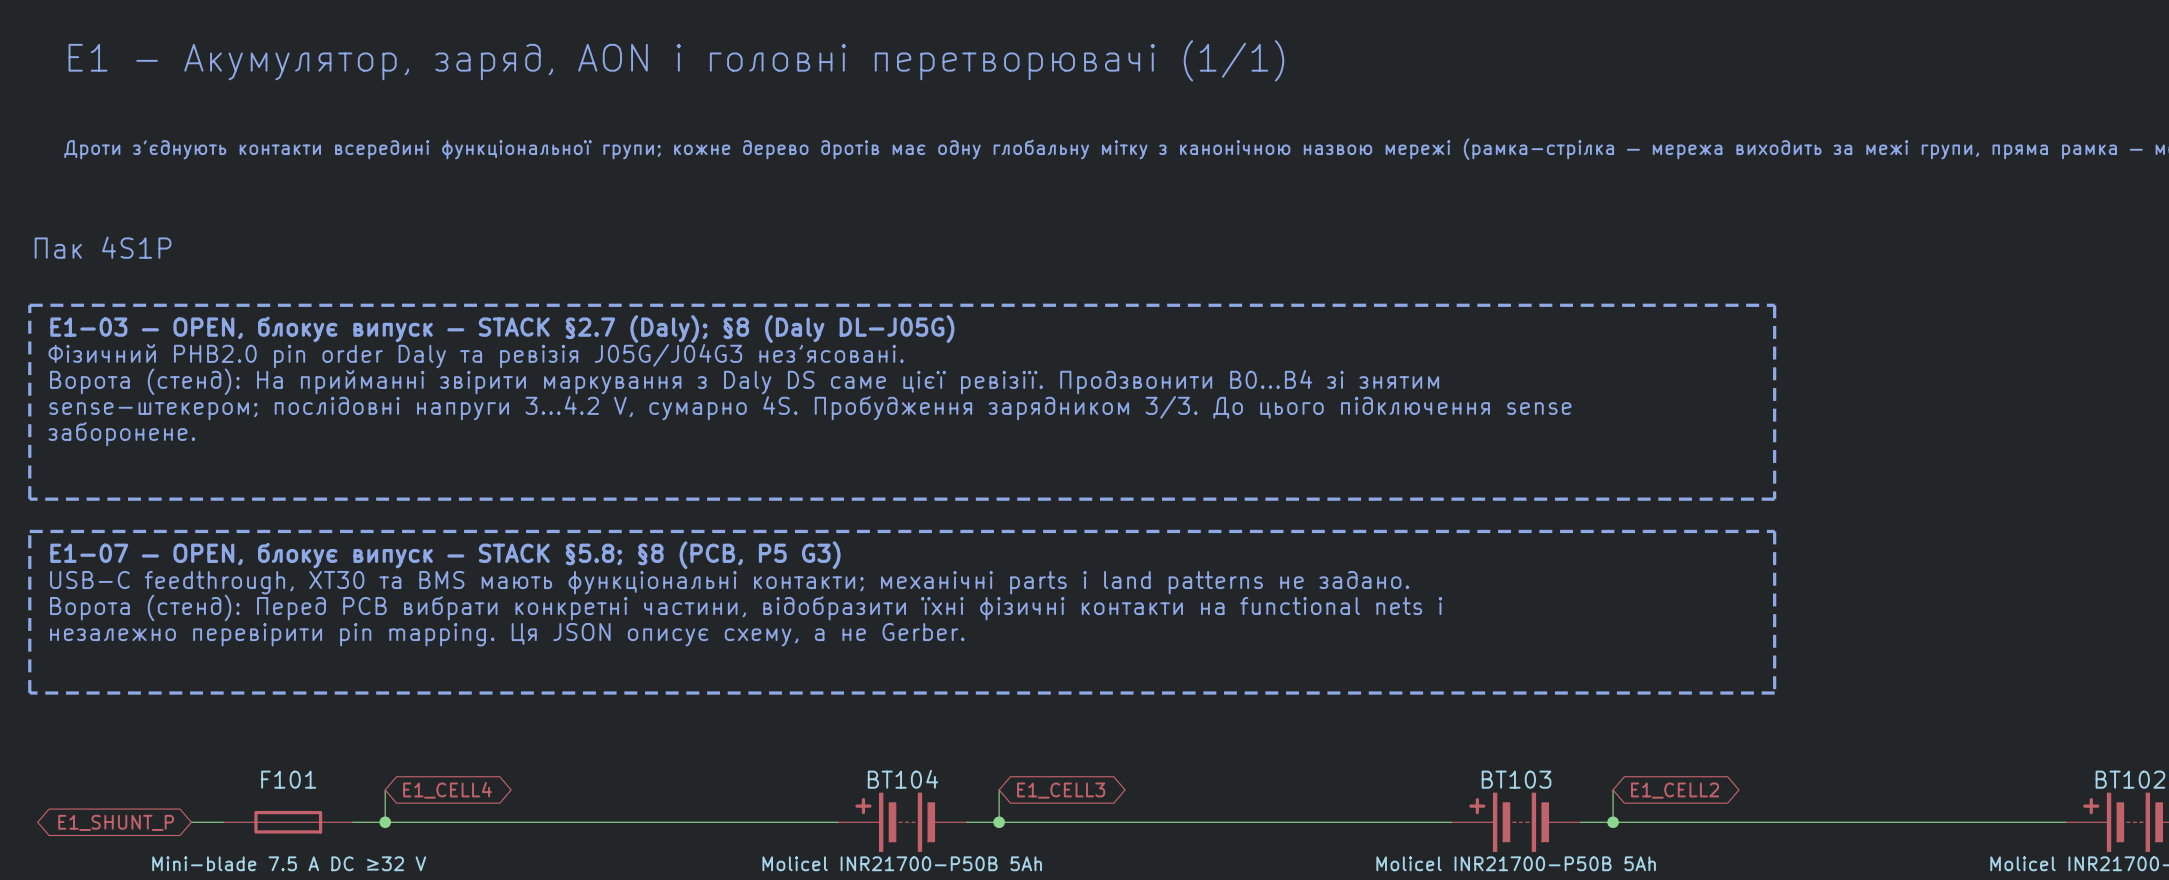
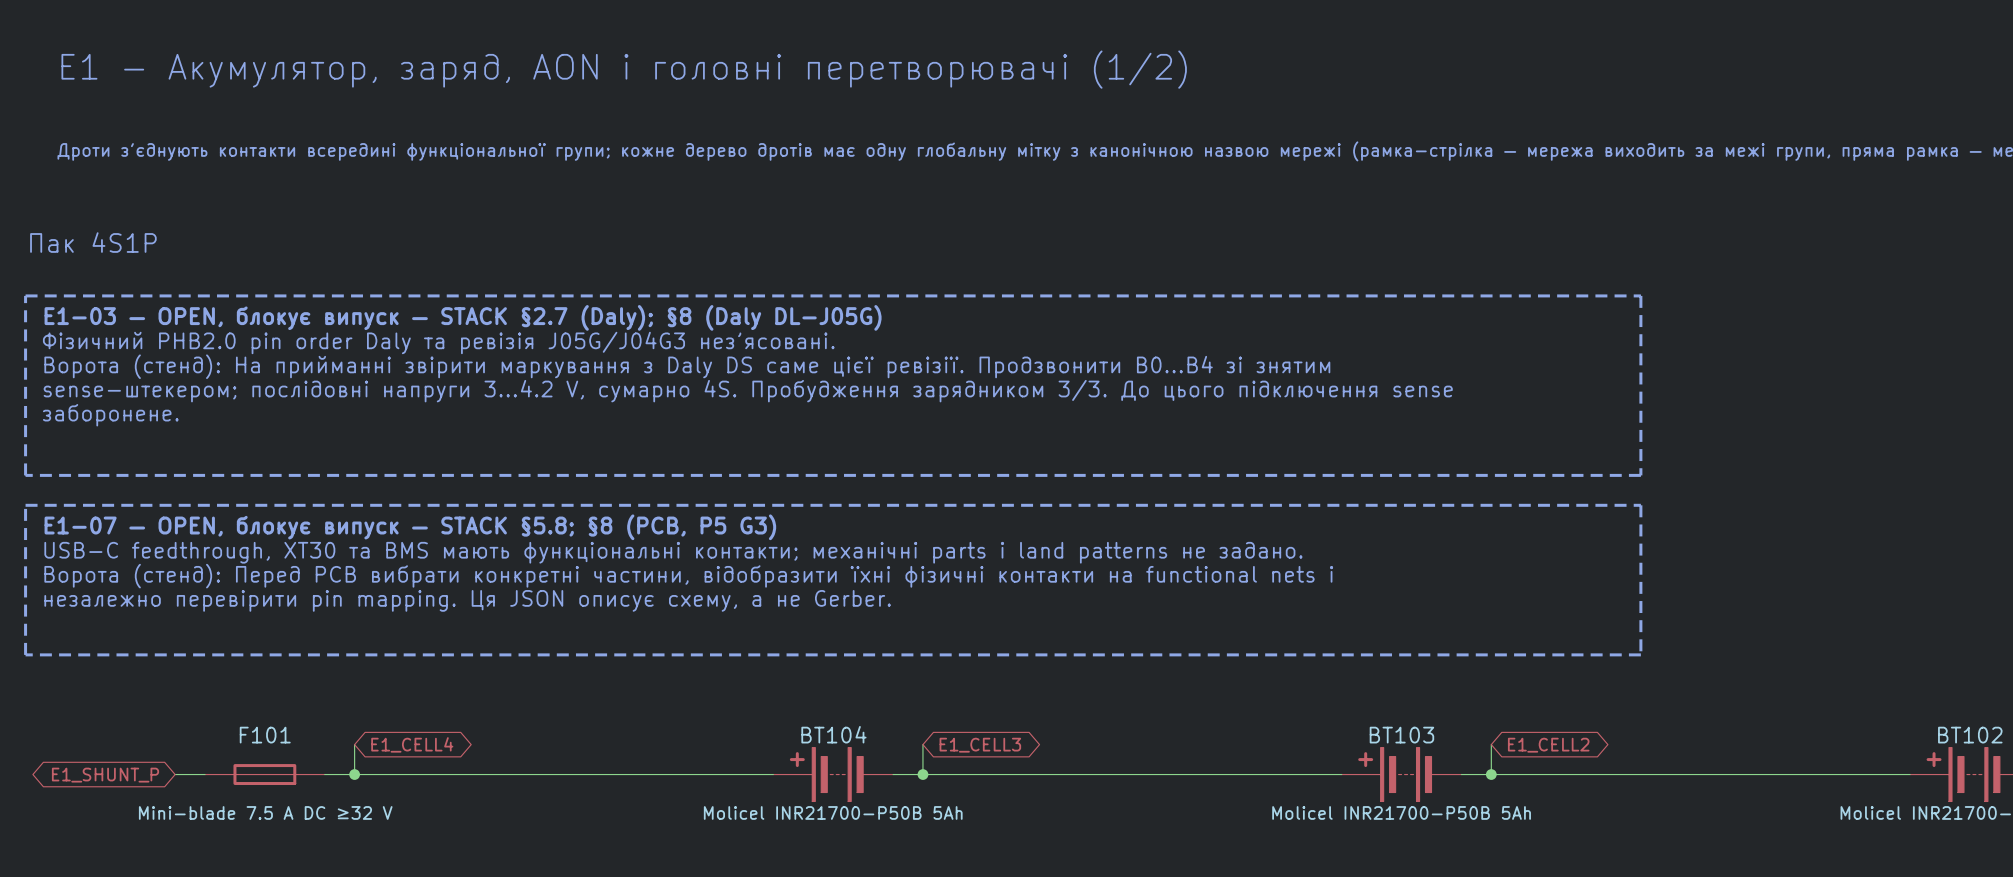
text: E1 - Акумулятор, заряд, AON і головні перетворювачі (1/1) (676, 60) -> E1 - Акумулятор, заряд, AON і головні перетворювачі (1/2) (624, 69)

